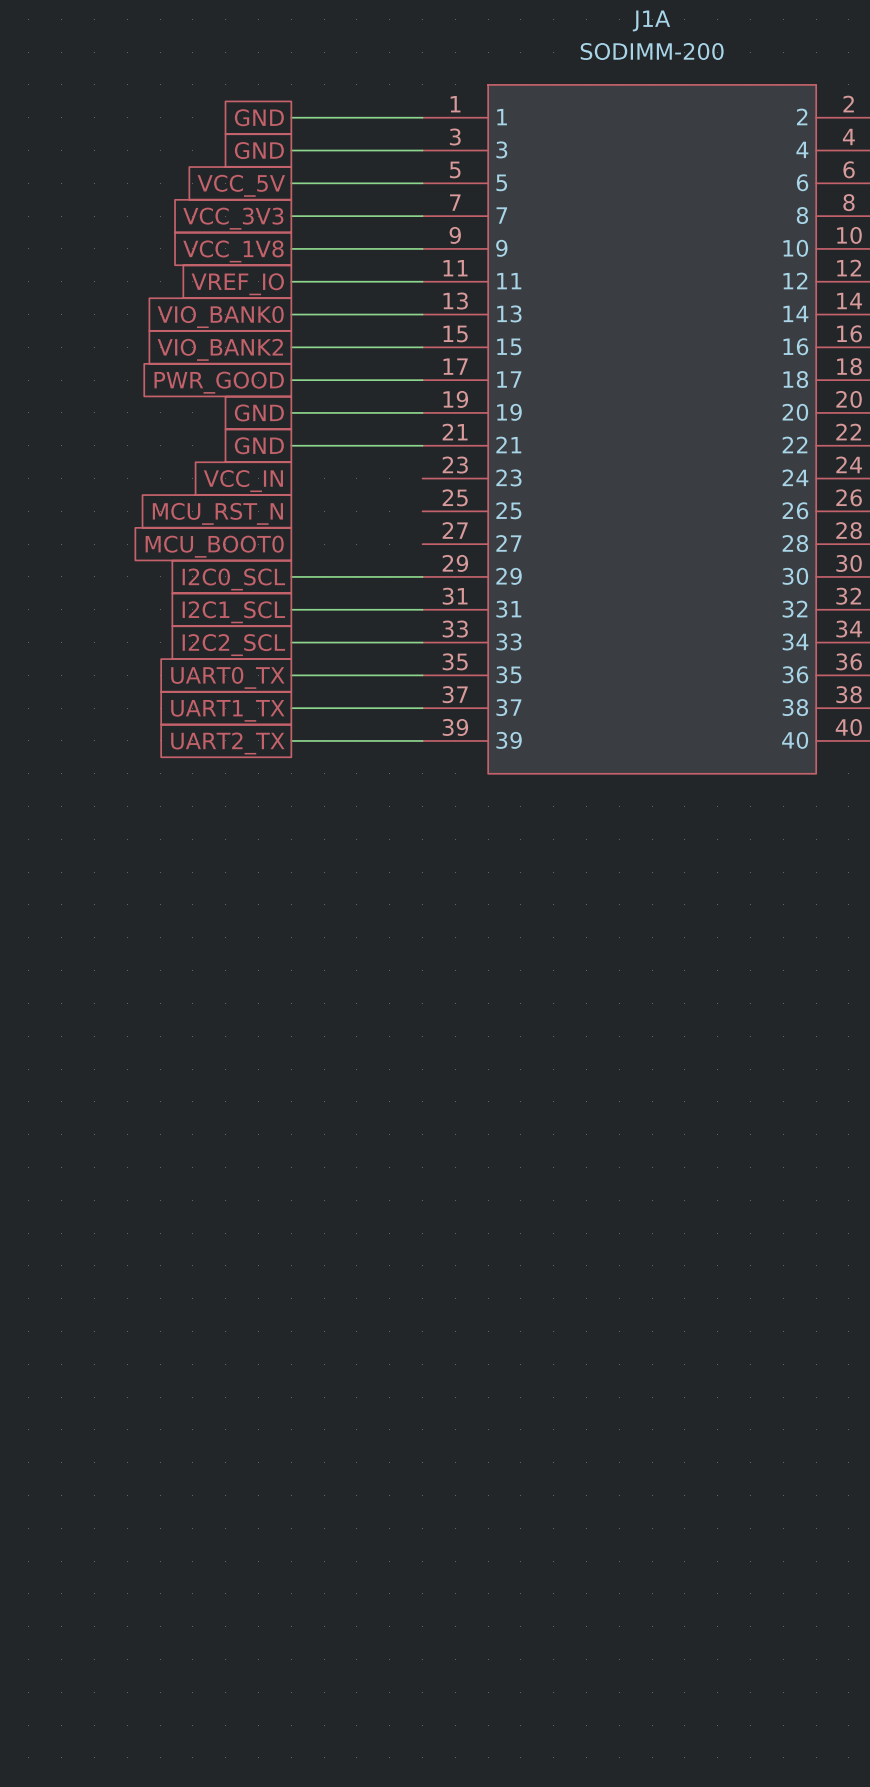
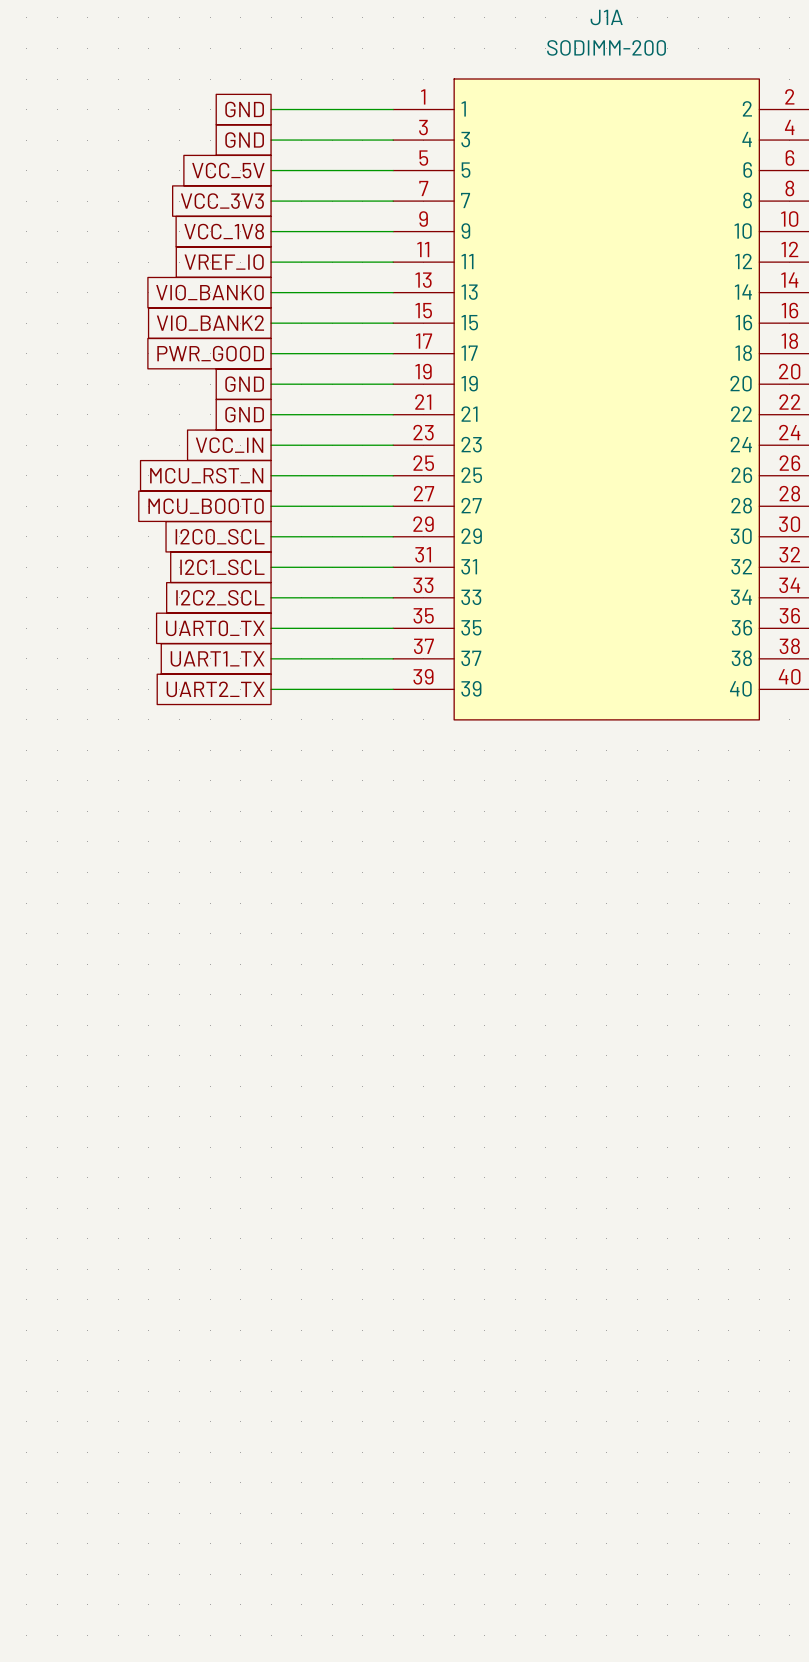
wire: none -> (271, 445) (393, 445)
wire: none -> (271, 475) (393, 475)
wire: none -> (271, 506) (393, 506)

